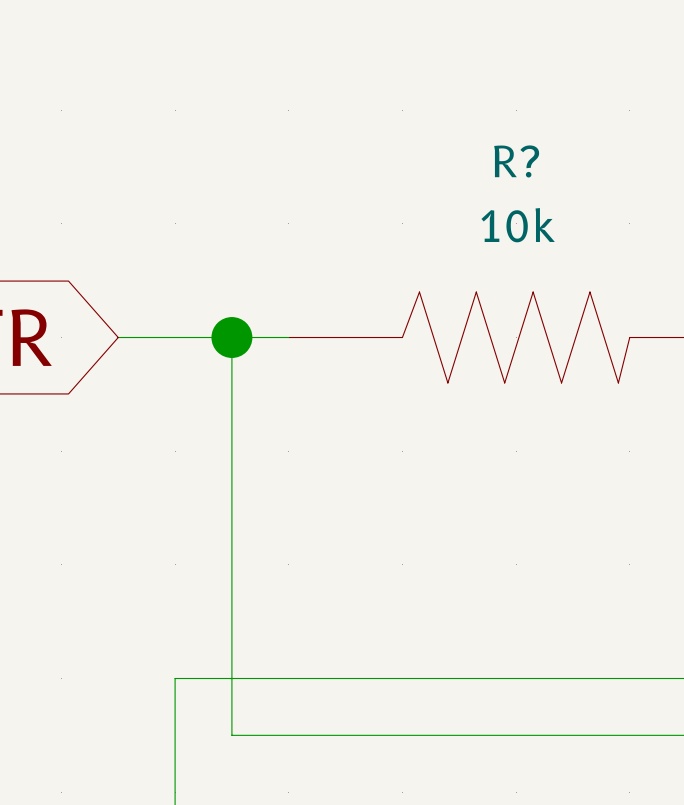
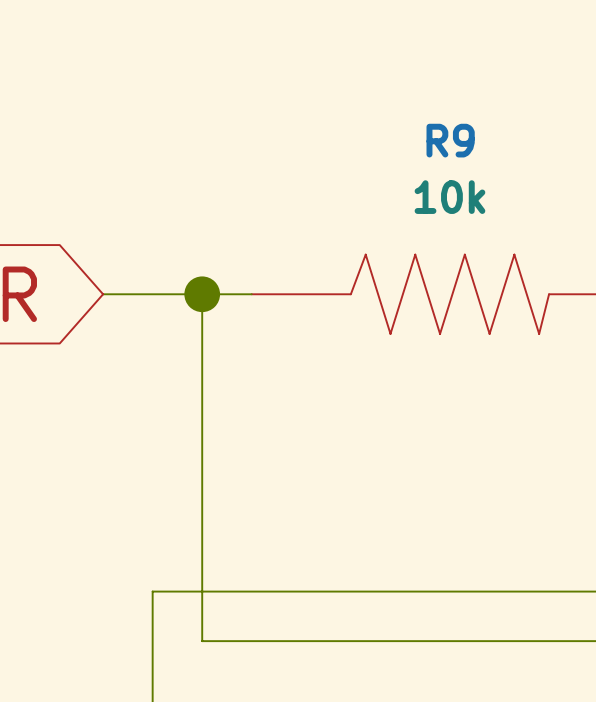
R? name: R? (516, 161) -> R9 (450, 140)

